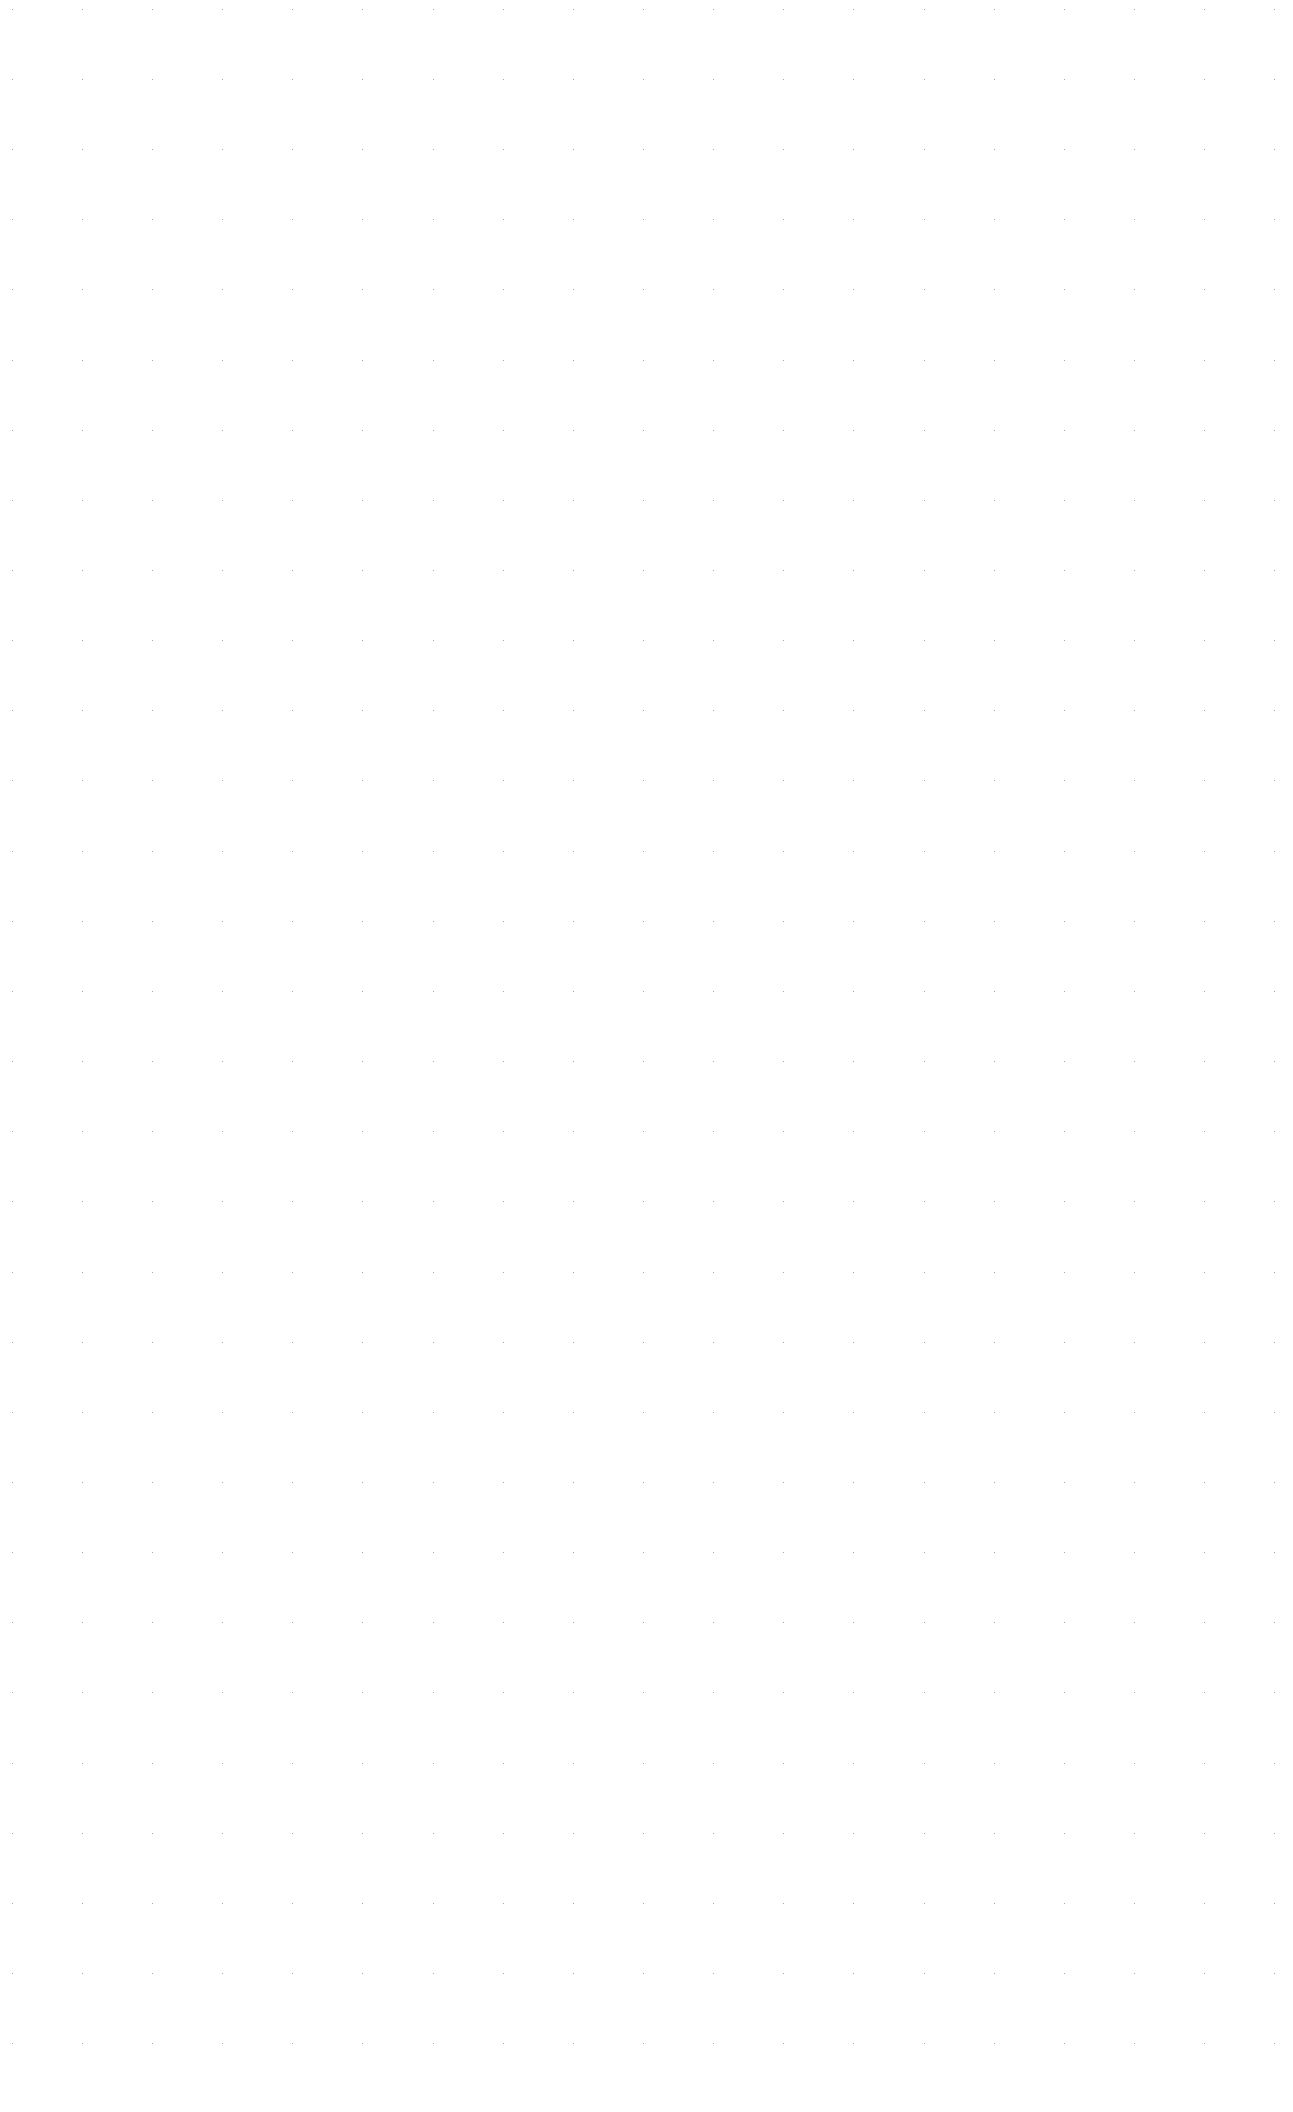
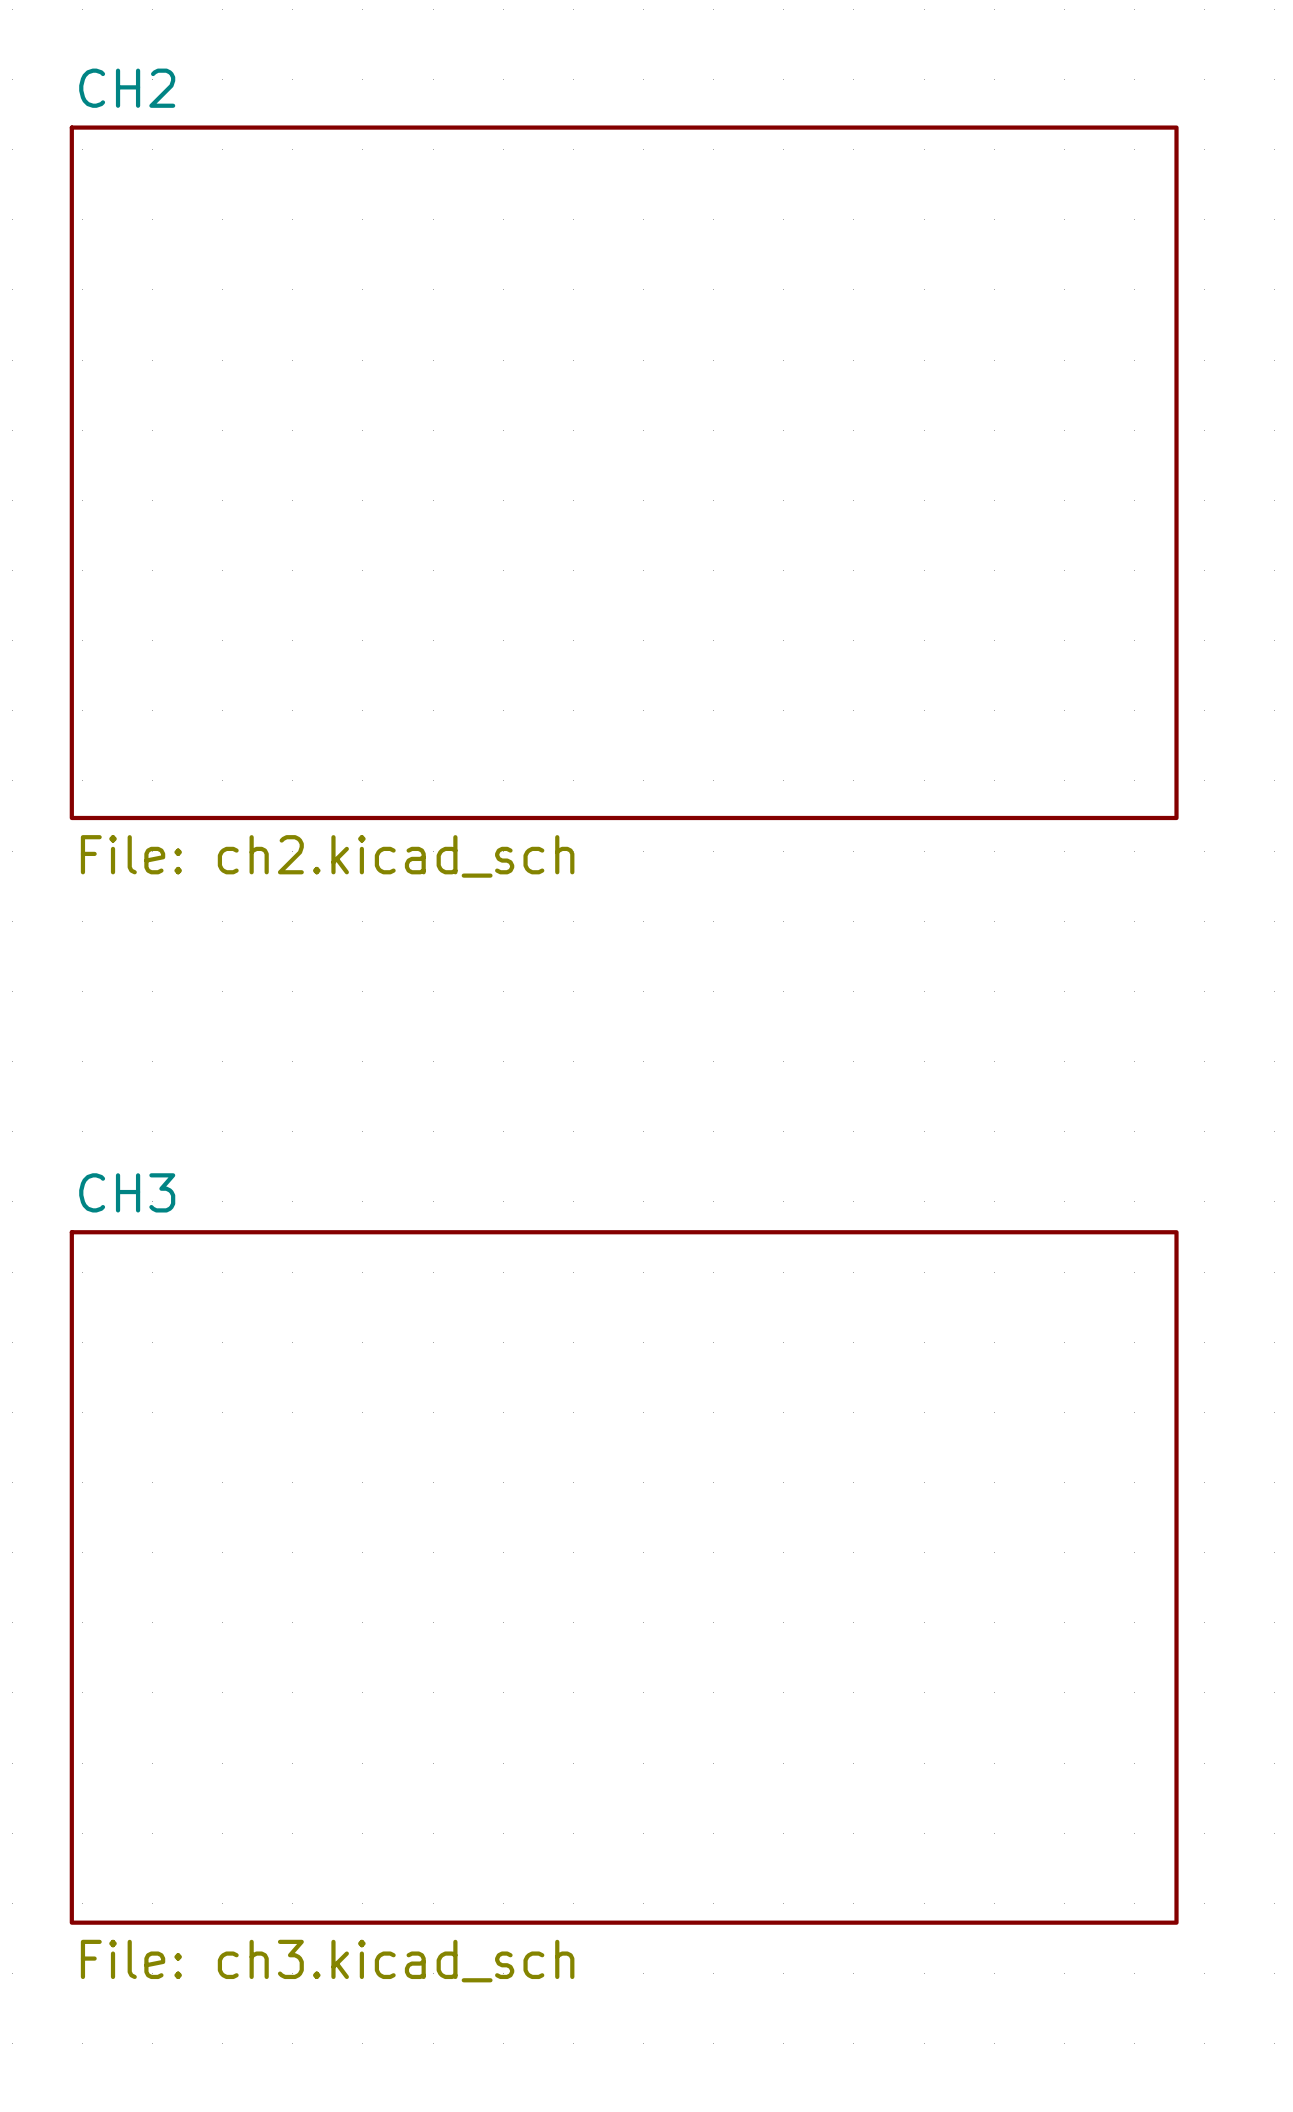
sheet CH2: none -> File: ch2.kicad_sch (624, 472)
sheet CH3: none -> File: ch3.kicad_sch (624, 1577)

